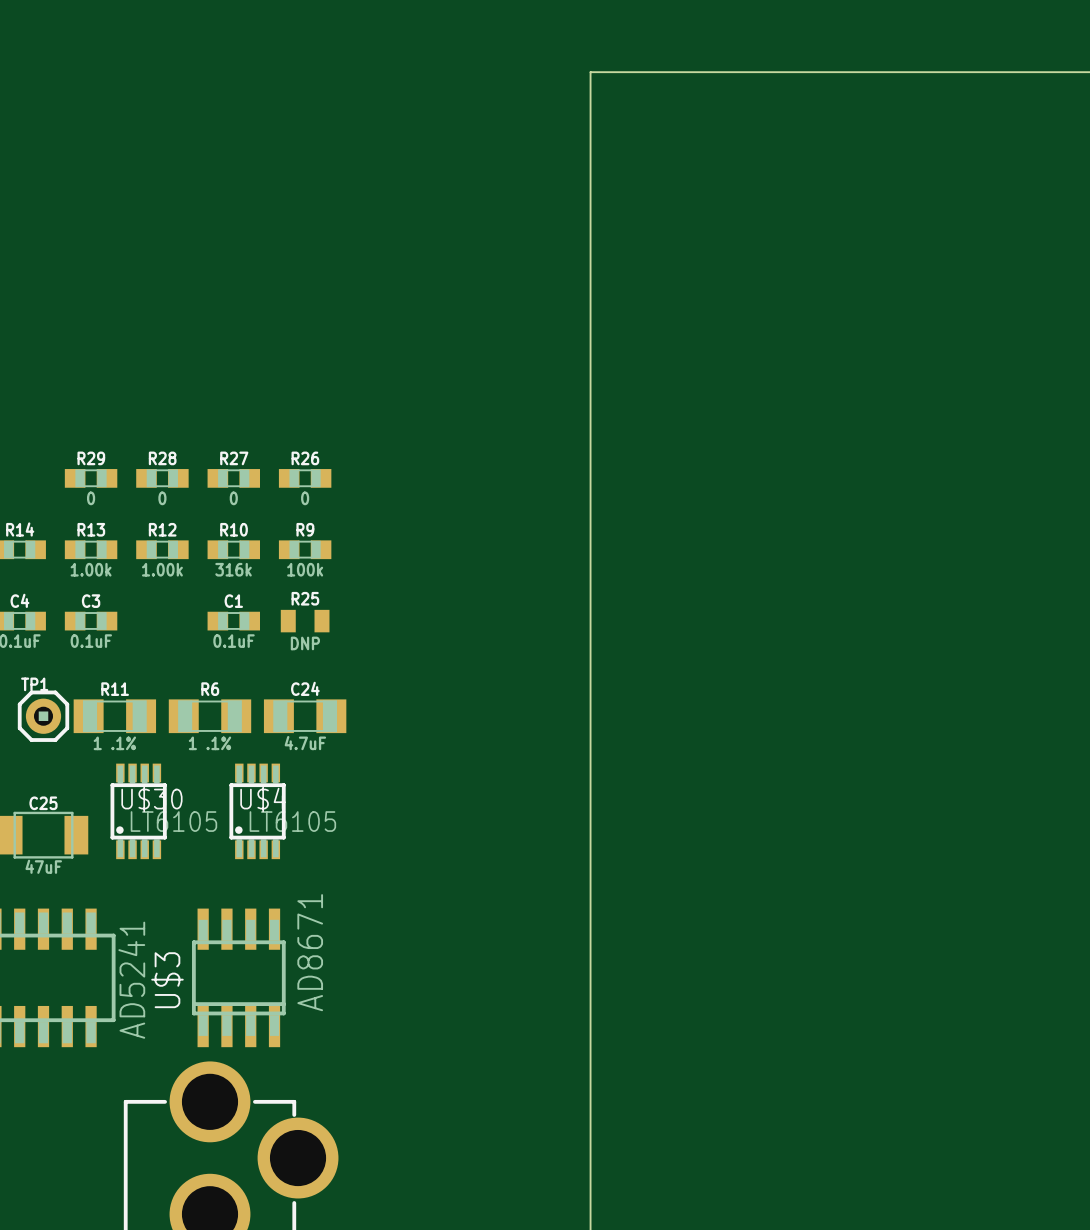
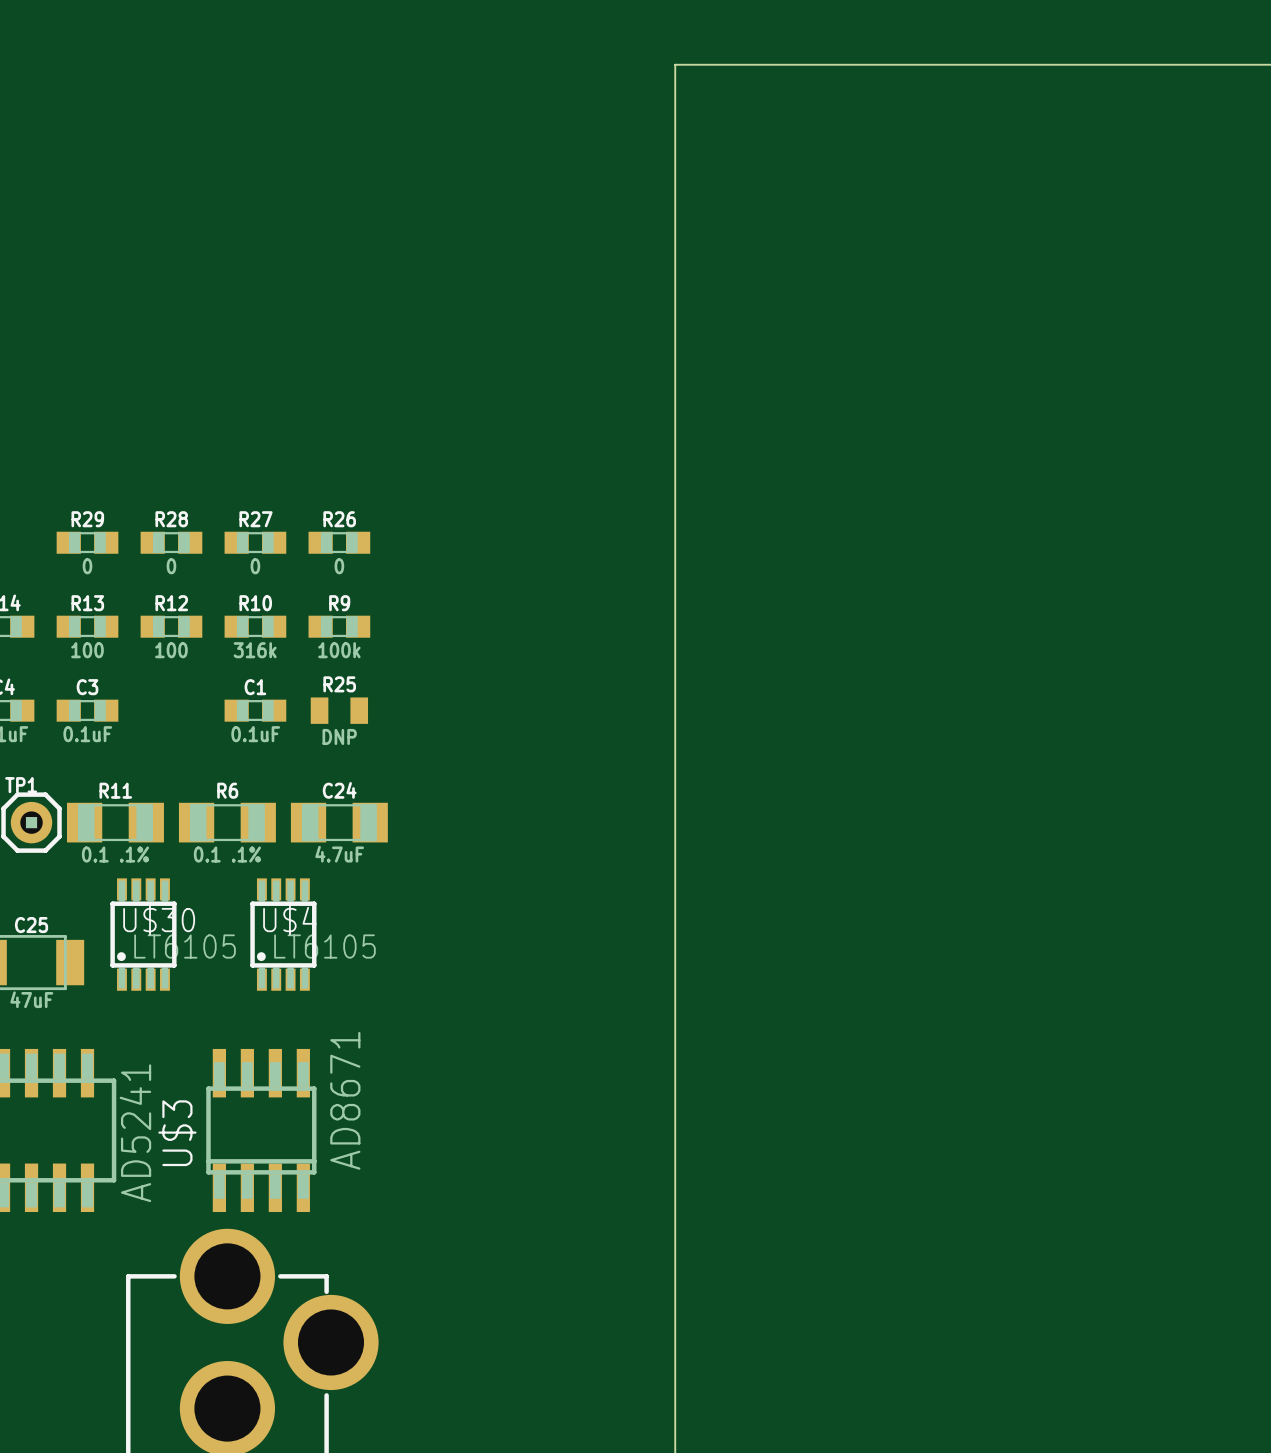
R13 value: 1.00k (91, 569) -> 100 (87, 650)
R12 value: 1.00k (162, 569) -> 100 (171, 650)
R11 value: 1 .1% (114, 743) -> 0.1 .1% (115, 854)
R6 value: 1 .1% (209, 743) -> 0.1 .1% (227, 854)

